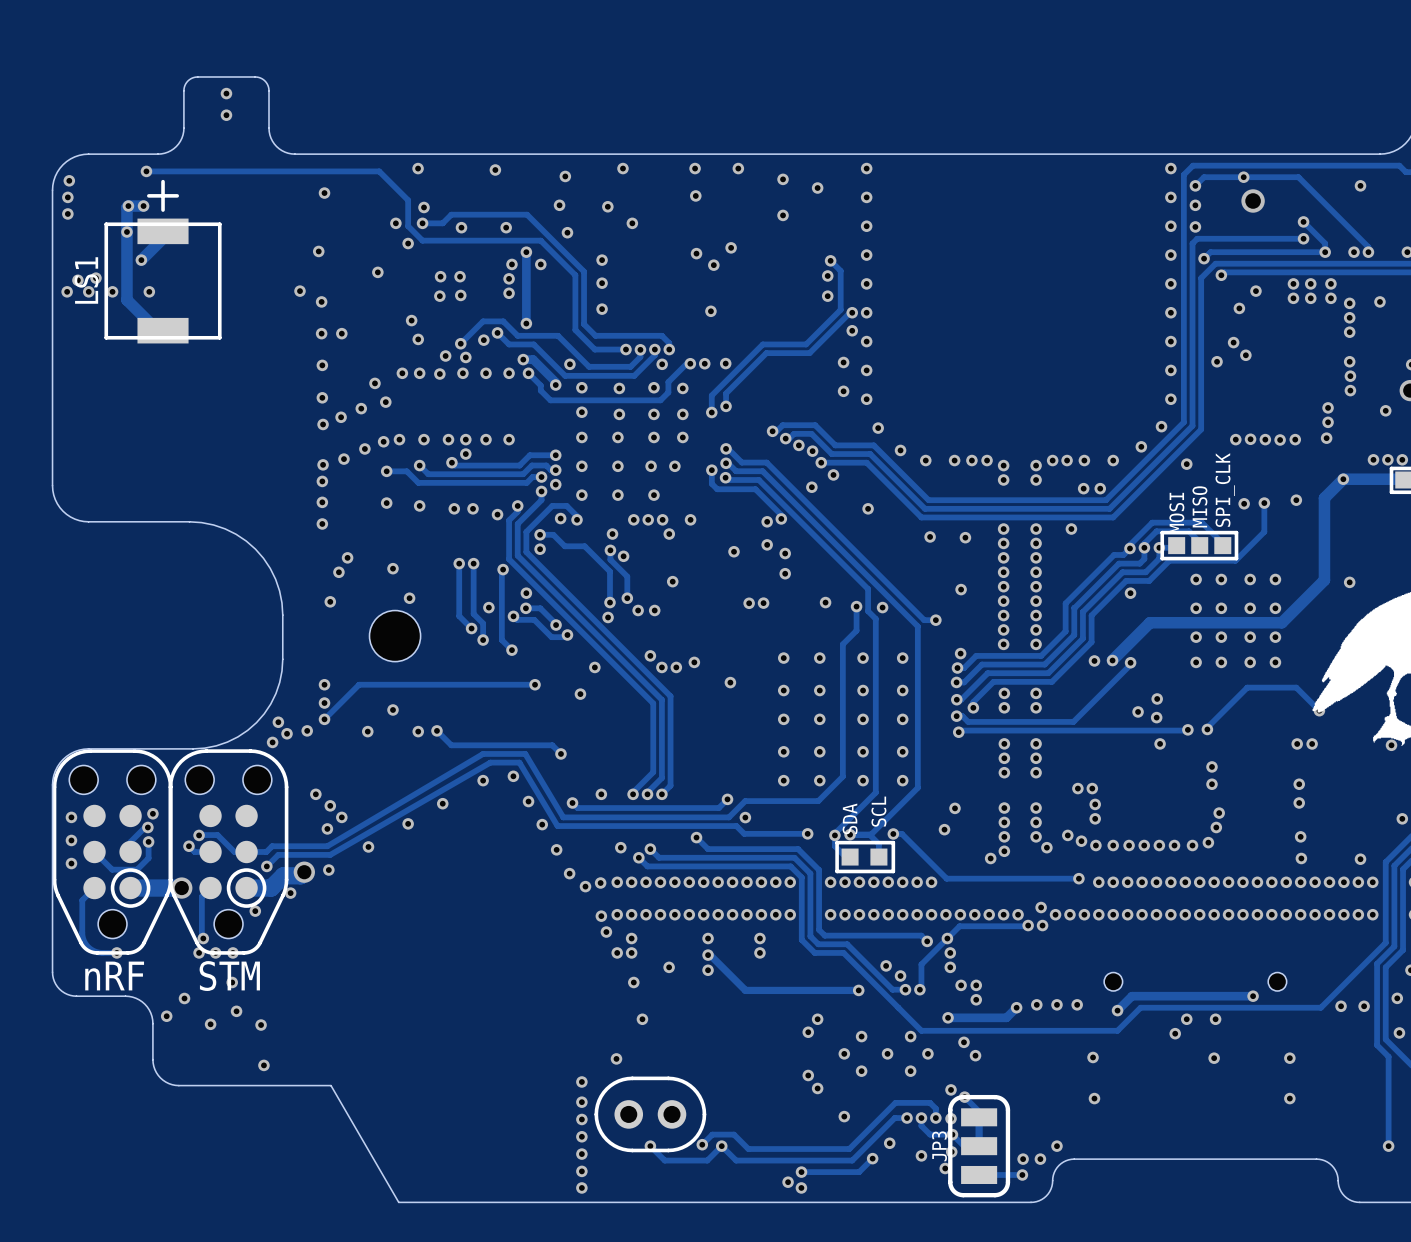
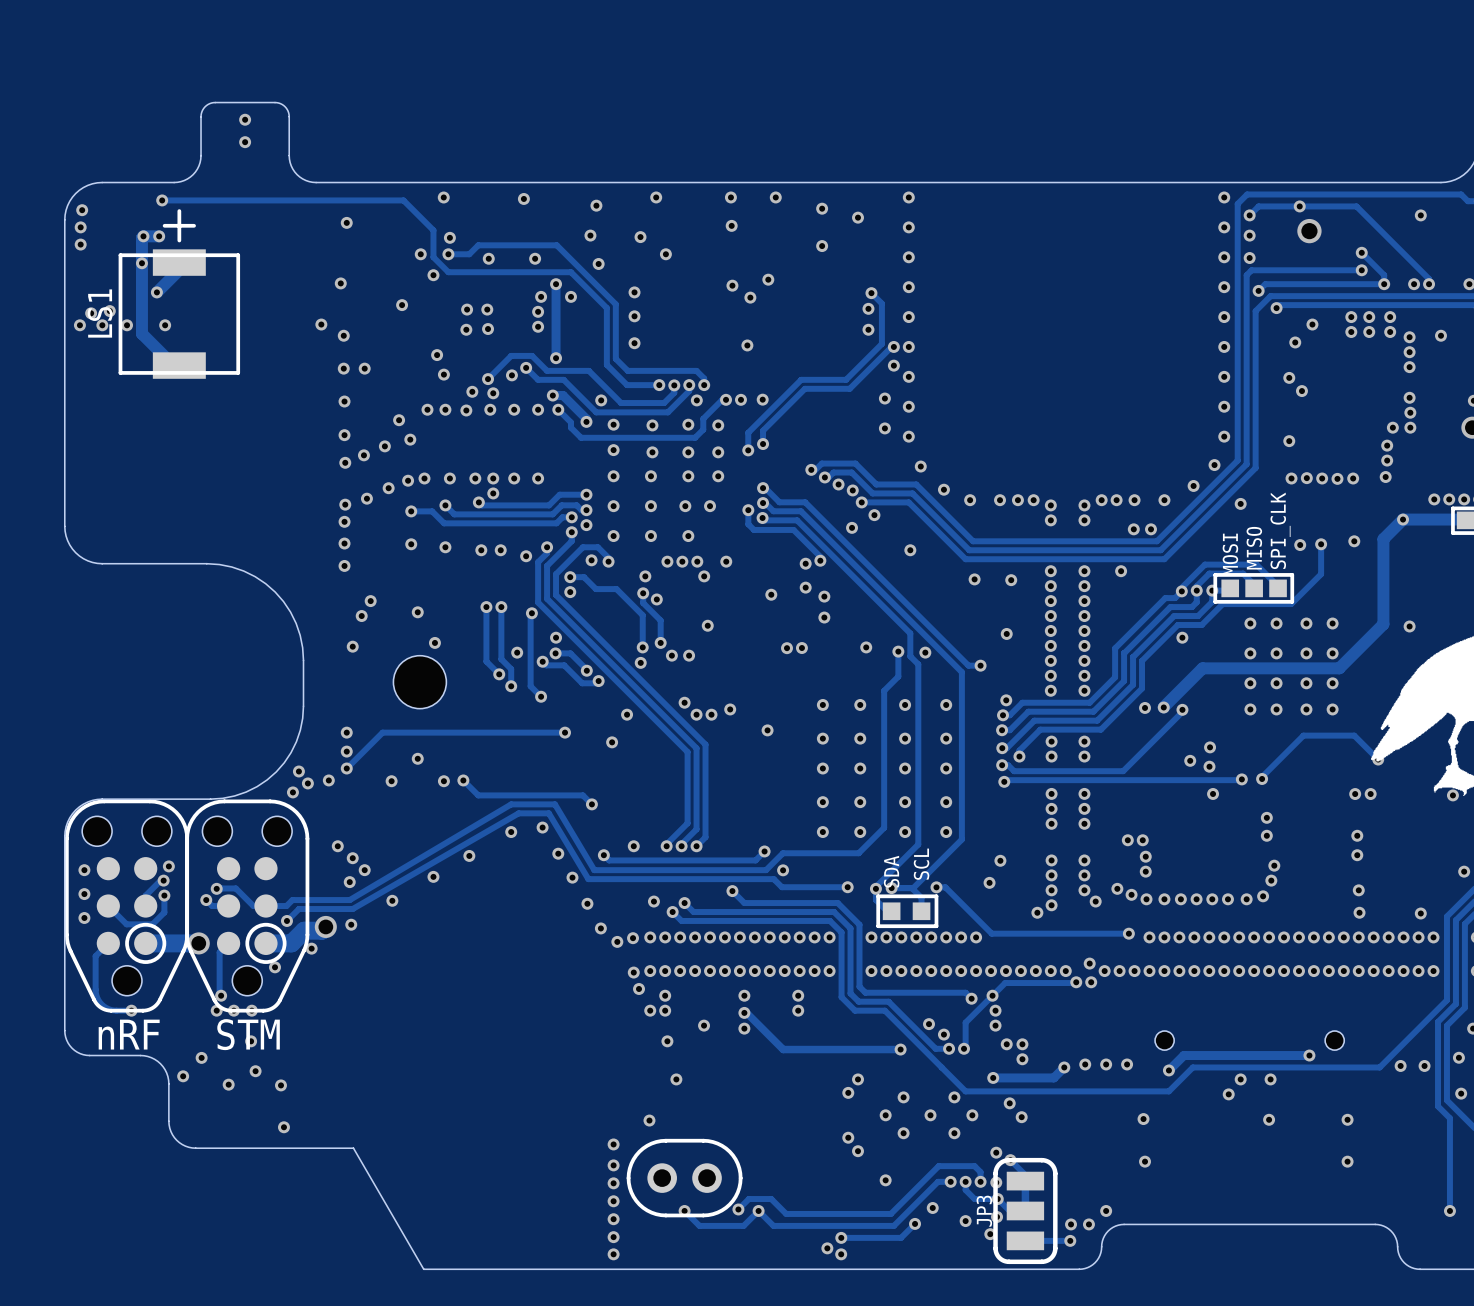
via position: (1217, 361) -> (1289, 441)
via position: (1385, 410) -> (1392, 427)

